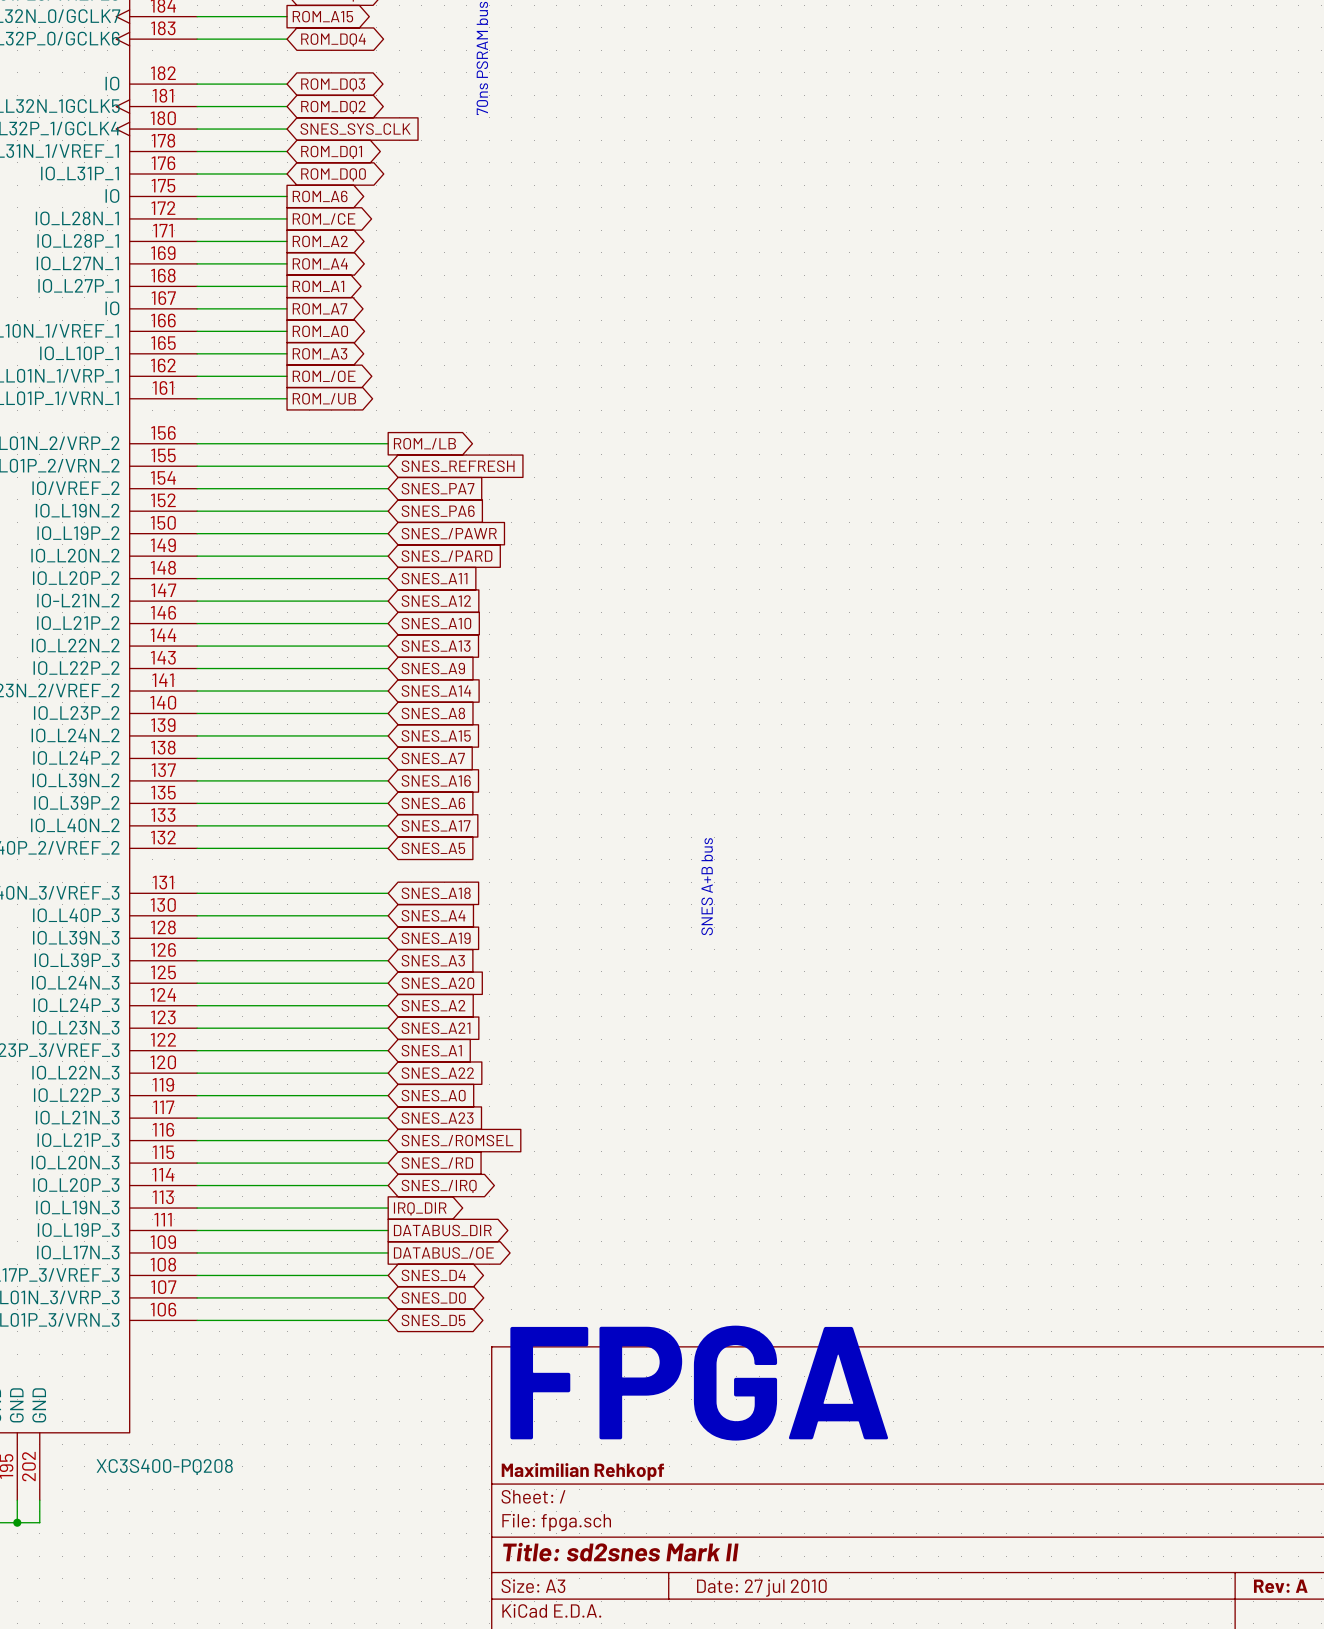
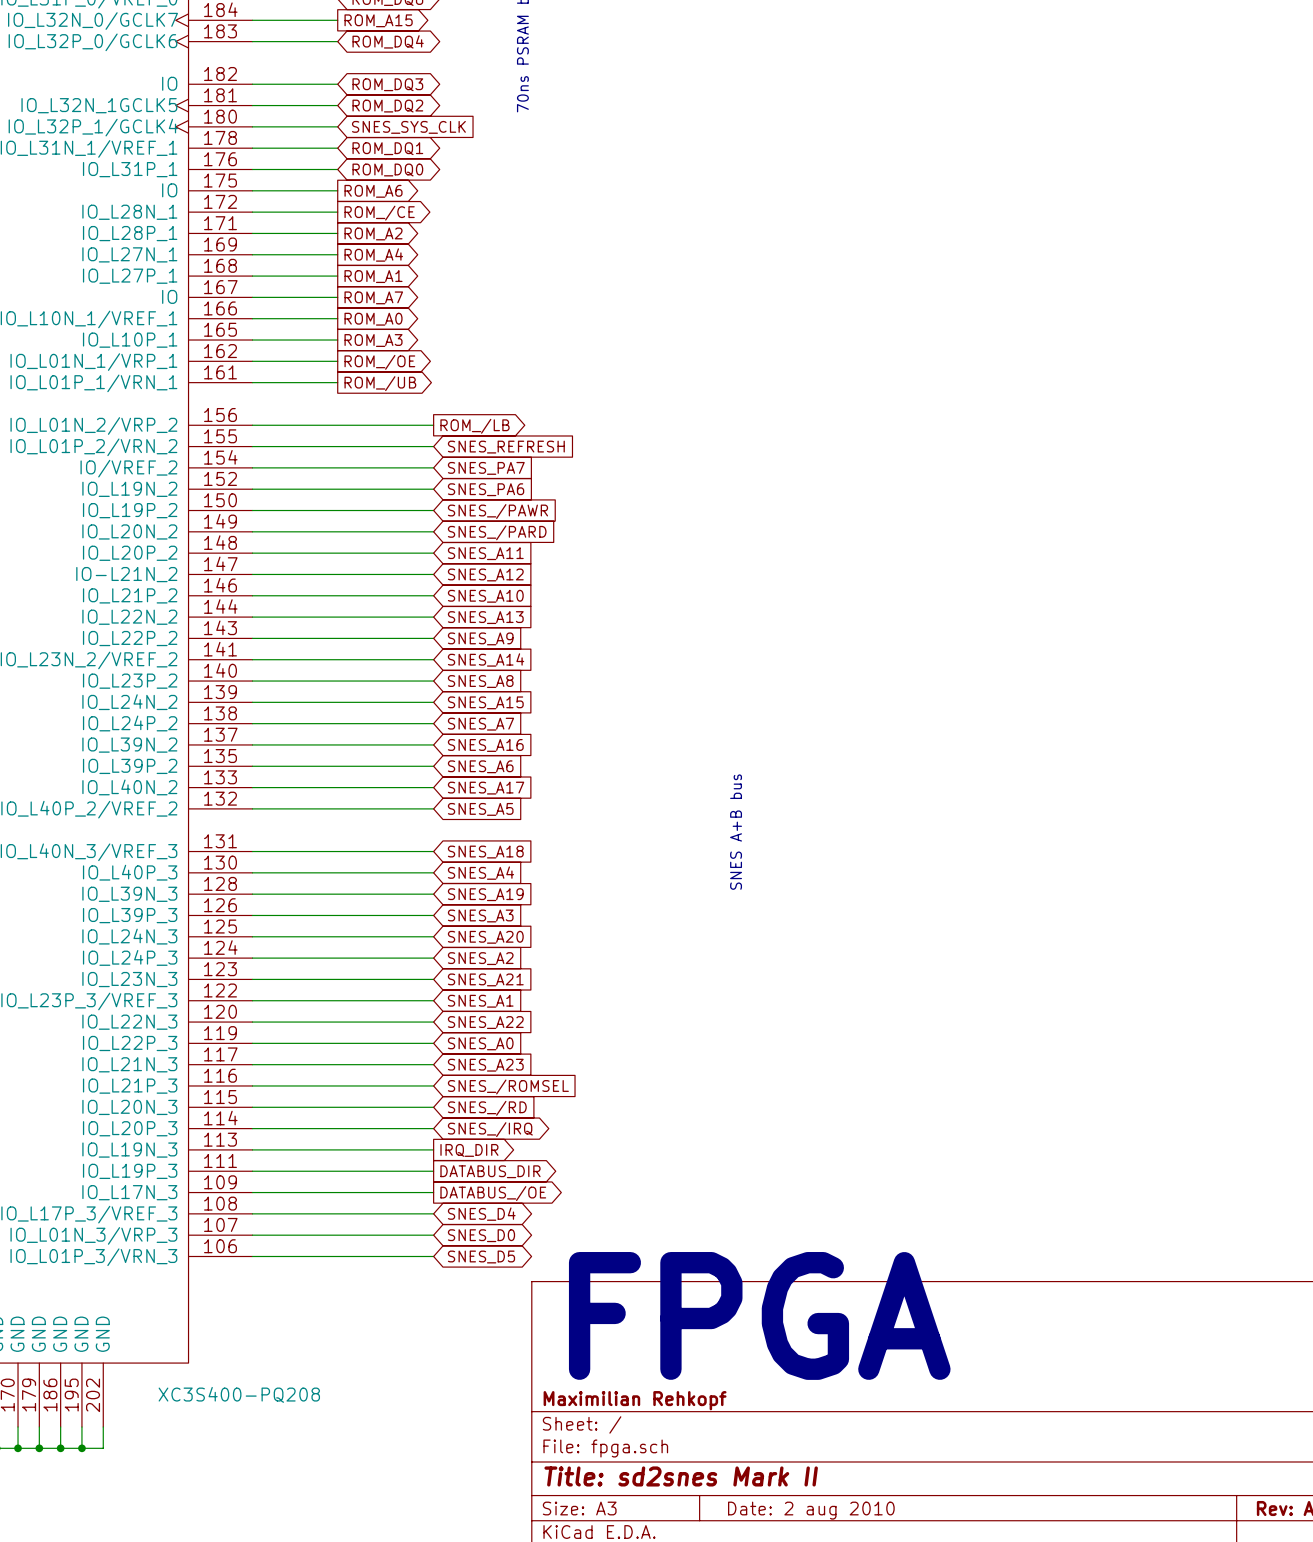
title block: Date: 27 jul 2010 (761, 1588) -> Date: 2 aug 2010 (811, 1510)

